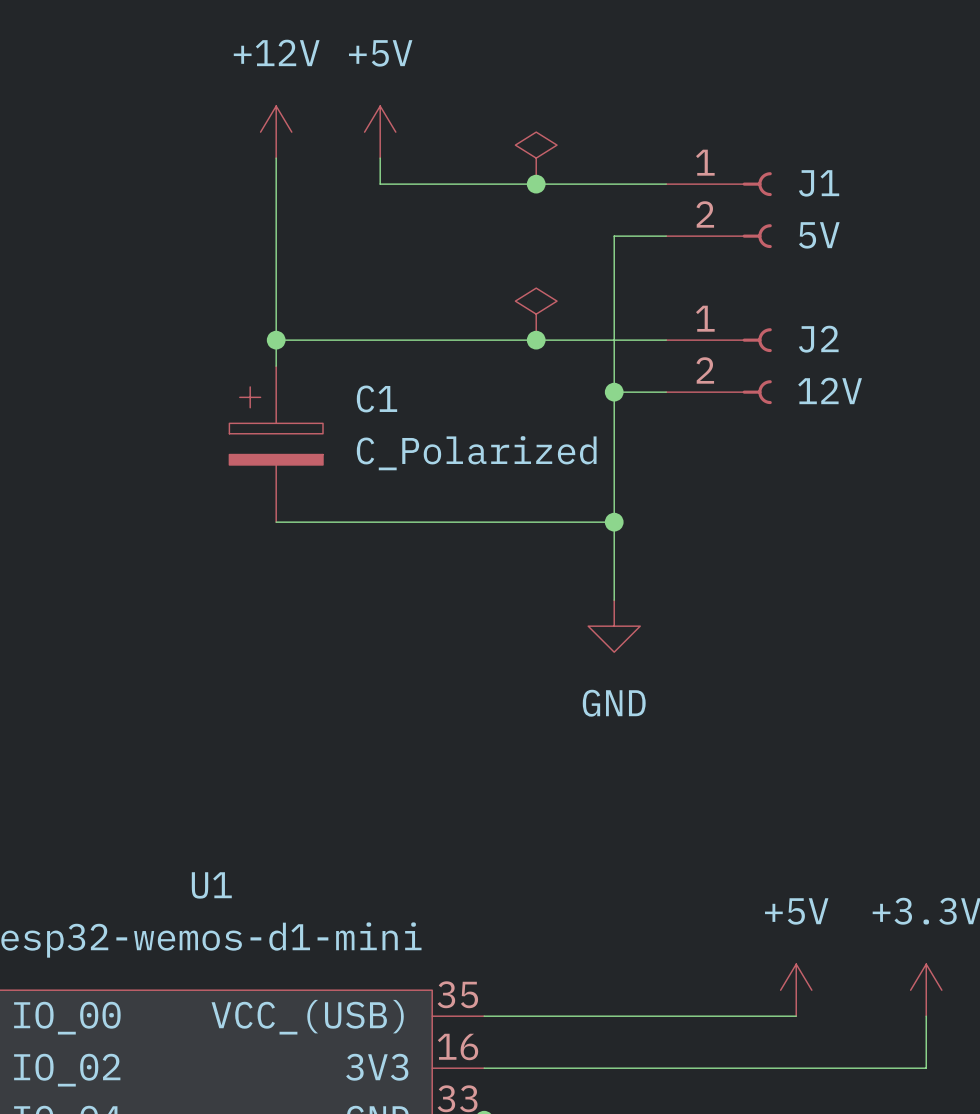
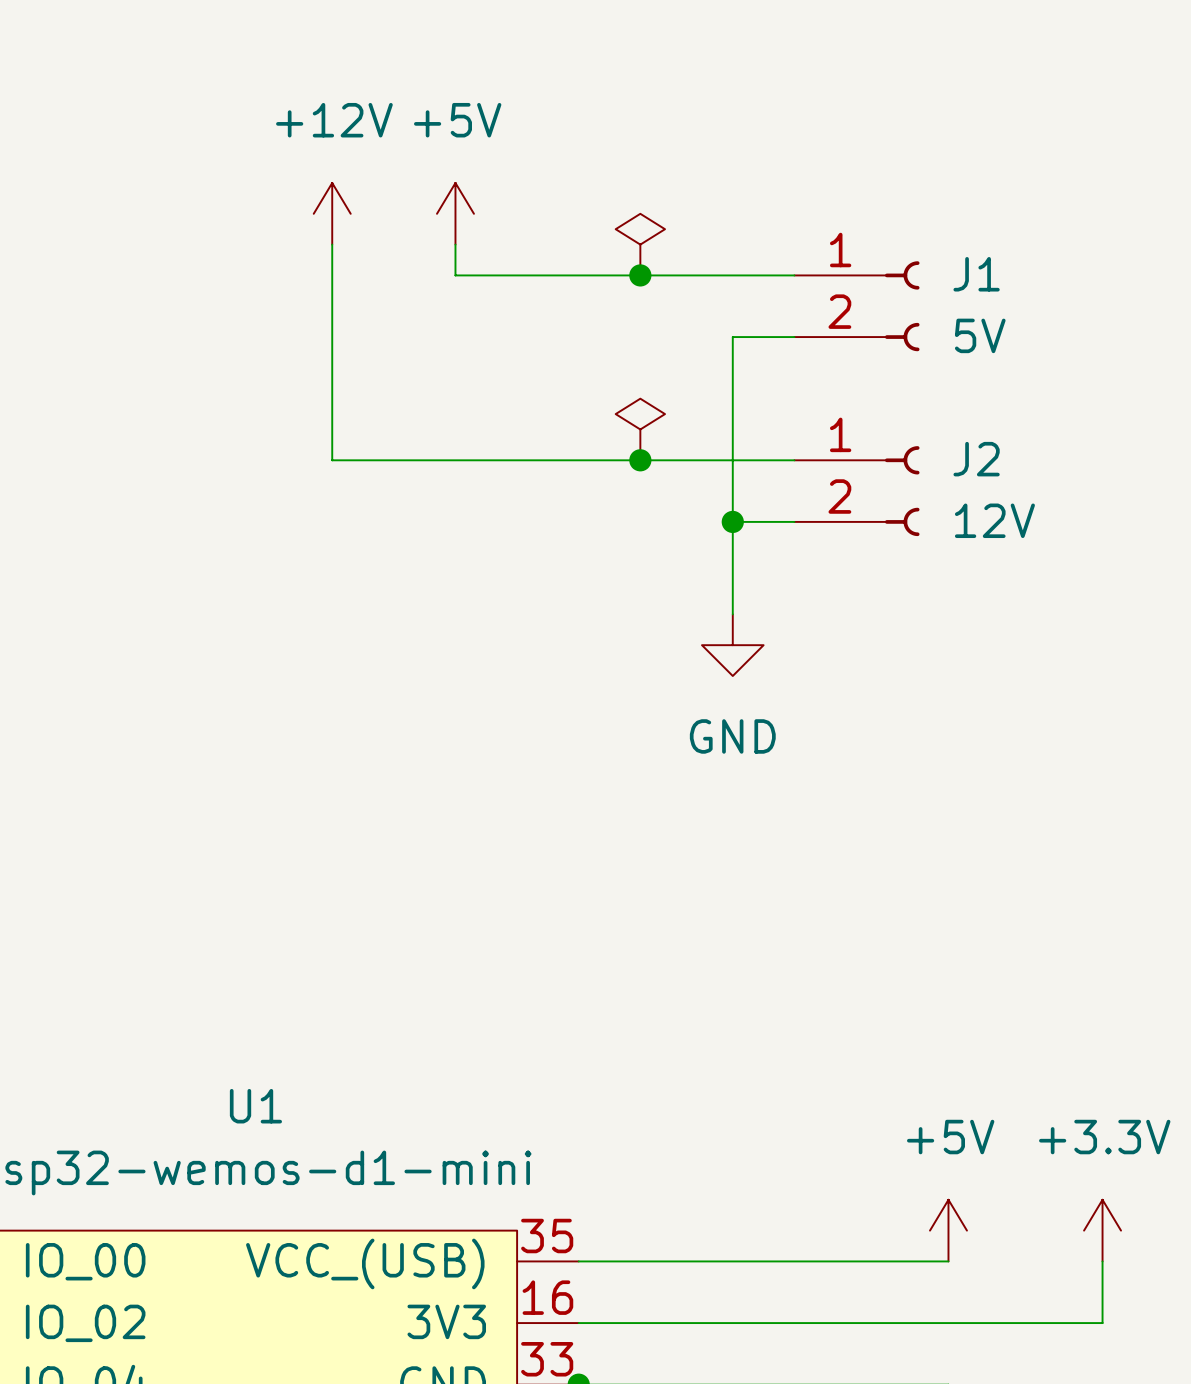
wire: (276, 340) (276, 366) -> none
junction: (276, 340) -> none
C1: C_Polarized (276, 444) -> none
wire: (614, 470) (614, 600) -> none
wire: (276, 522) (614, 522) -> none
junction: (614, 522) -> none
power symbol position: GND (614, 626) -> GND (732, 645)

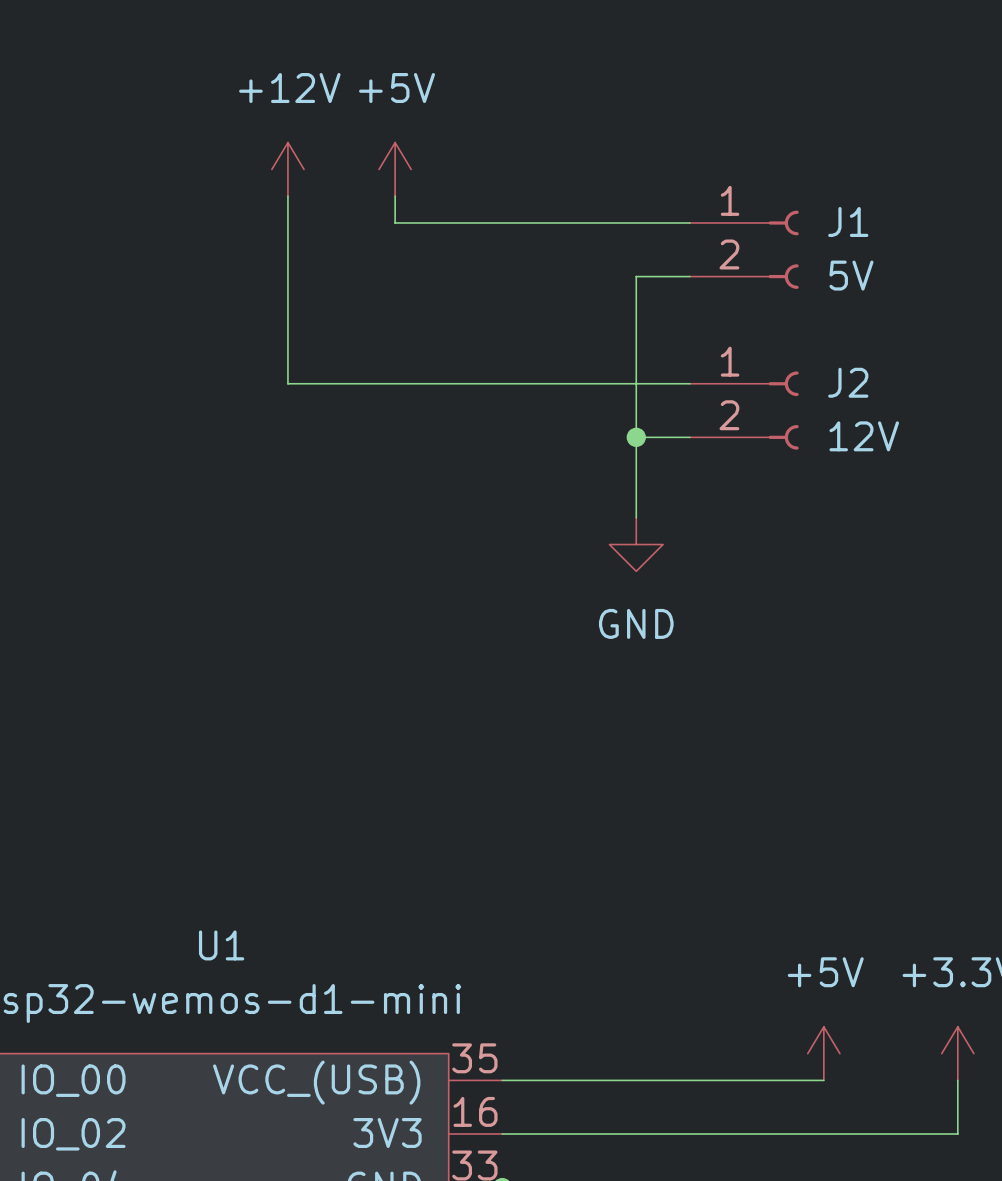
power symbol: (640, 244) -> none
junction: (640, 275) -> none
power symbol: (640, 429) -> none
junction: (640, 460) -> none

